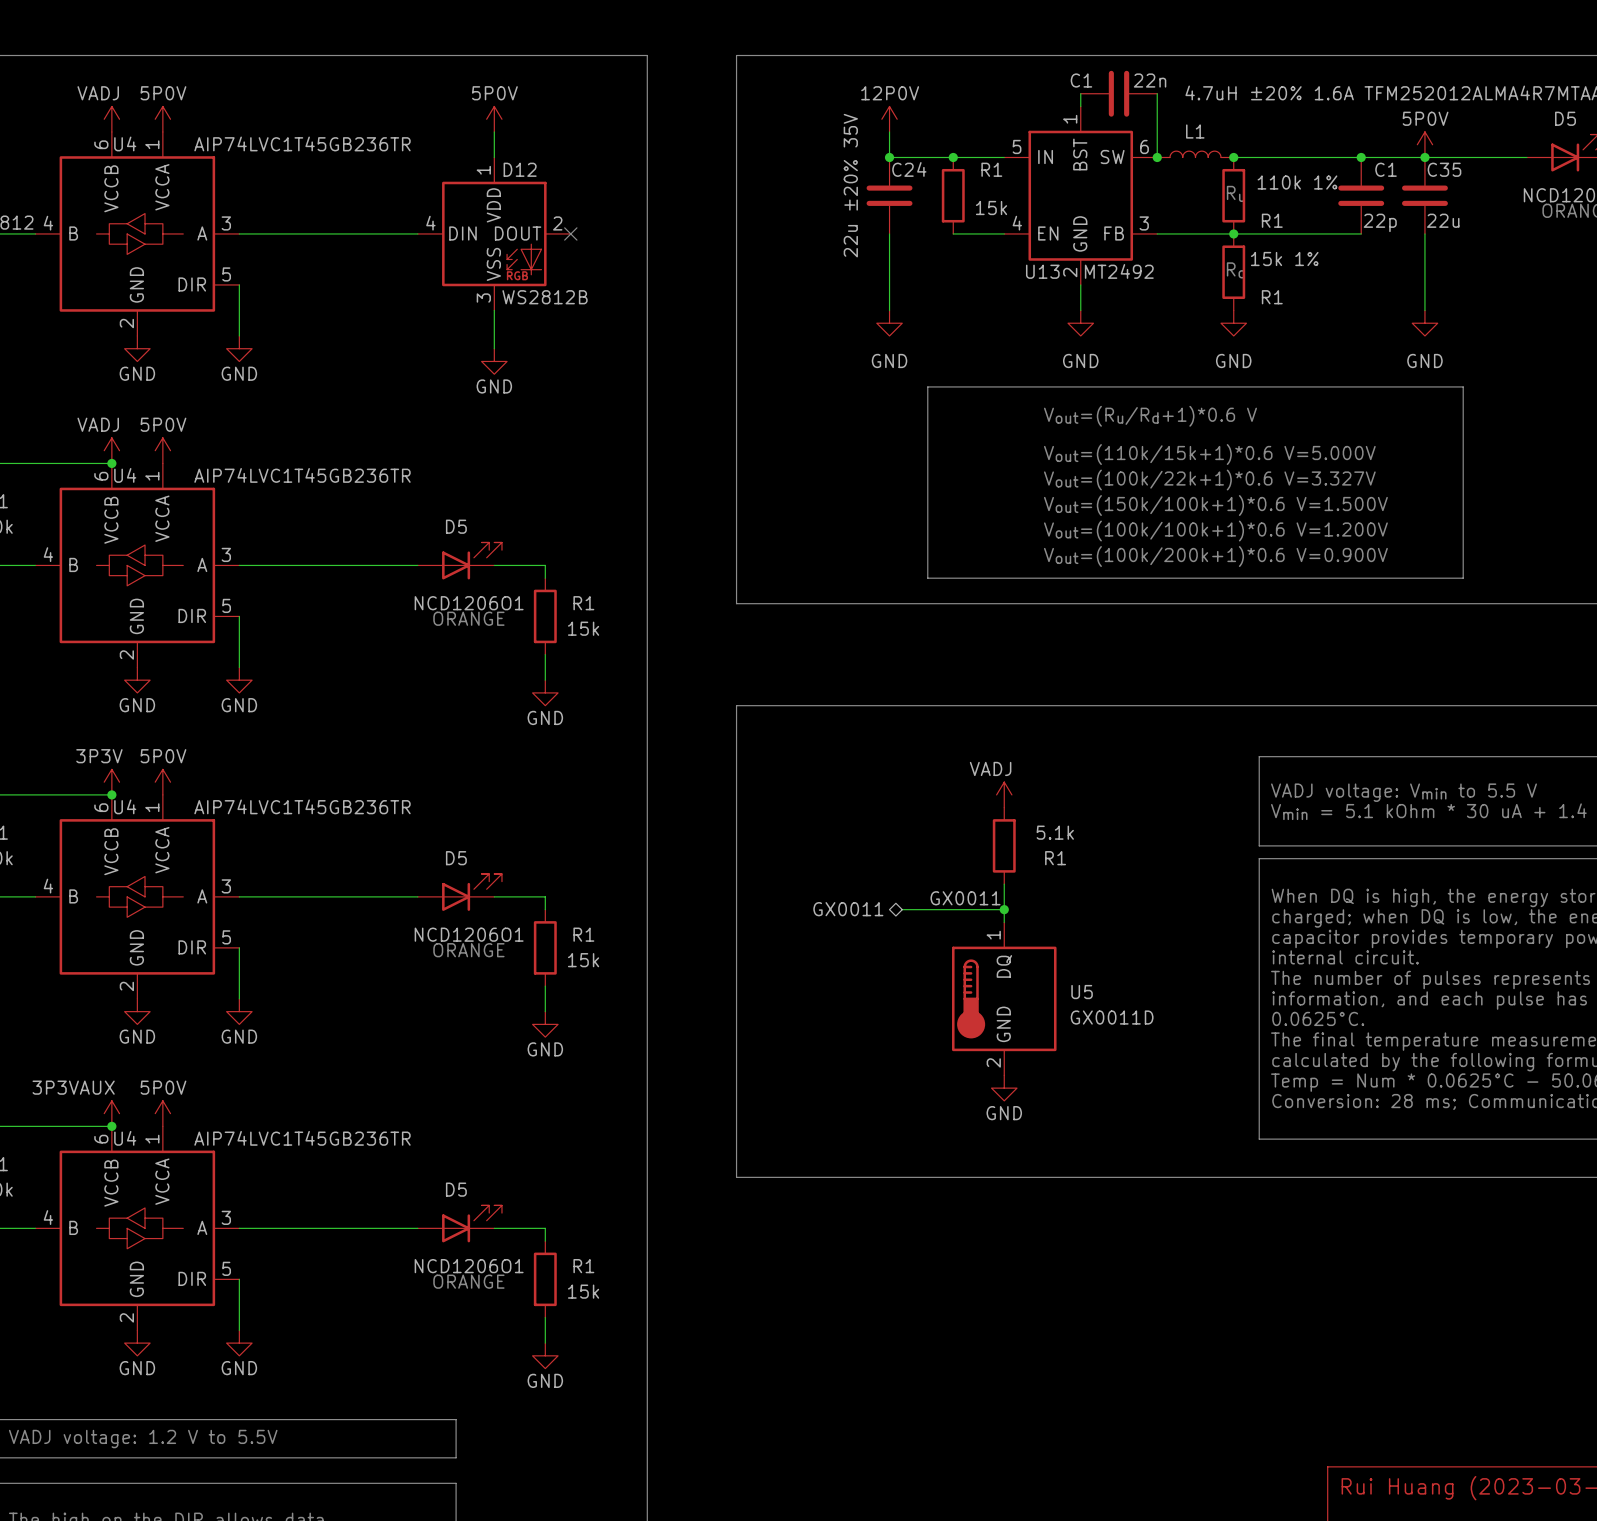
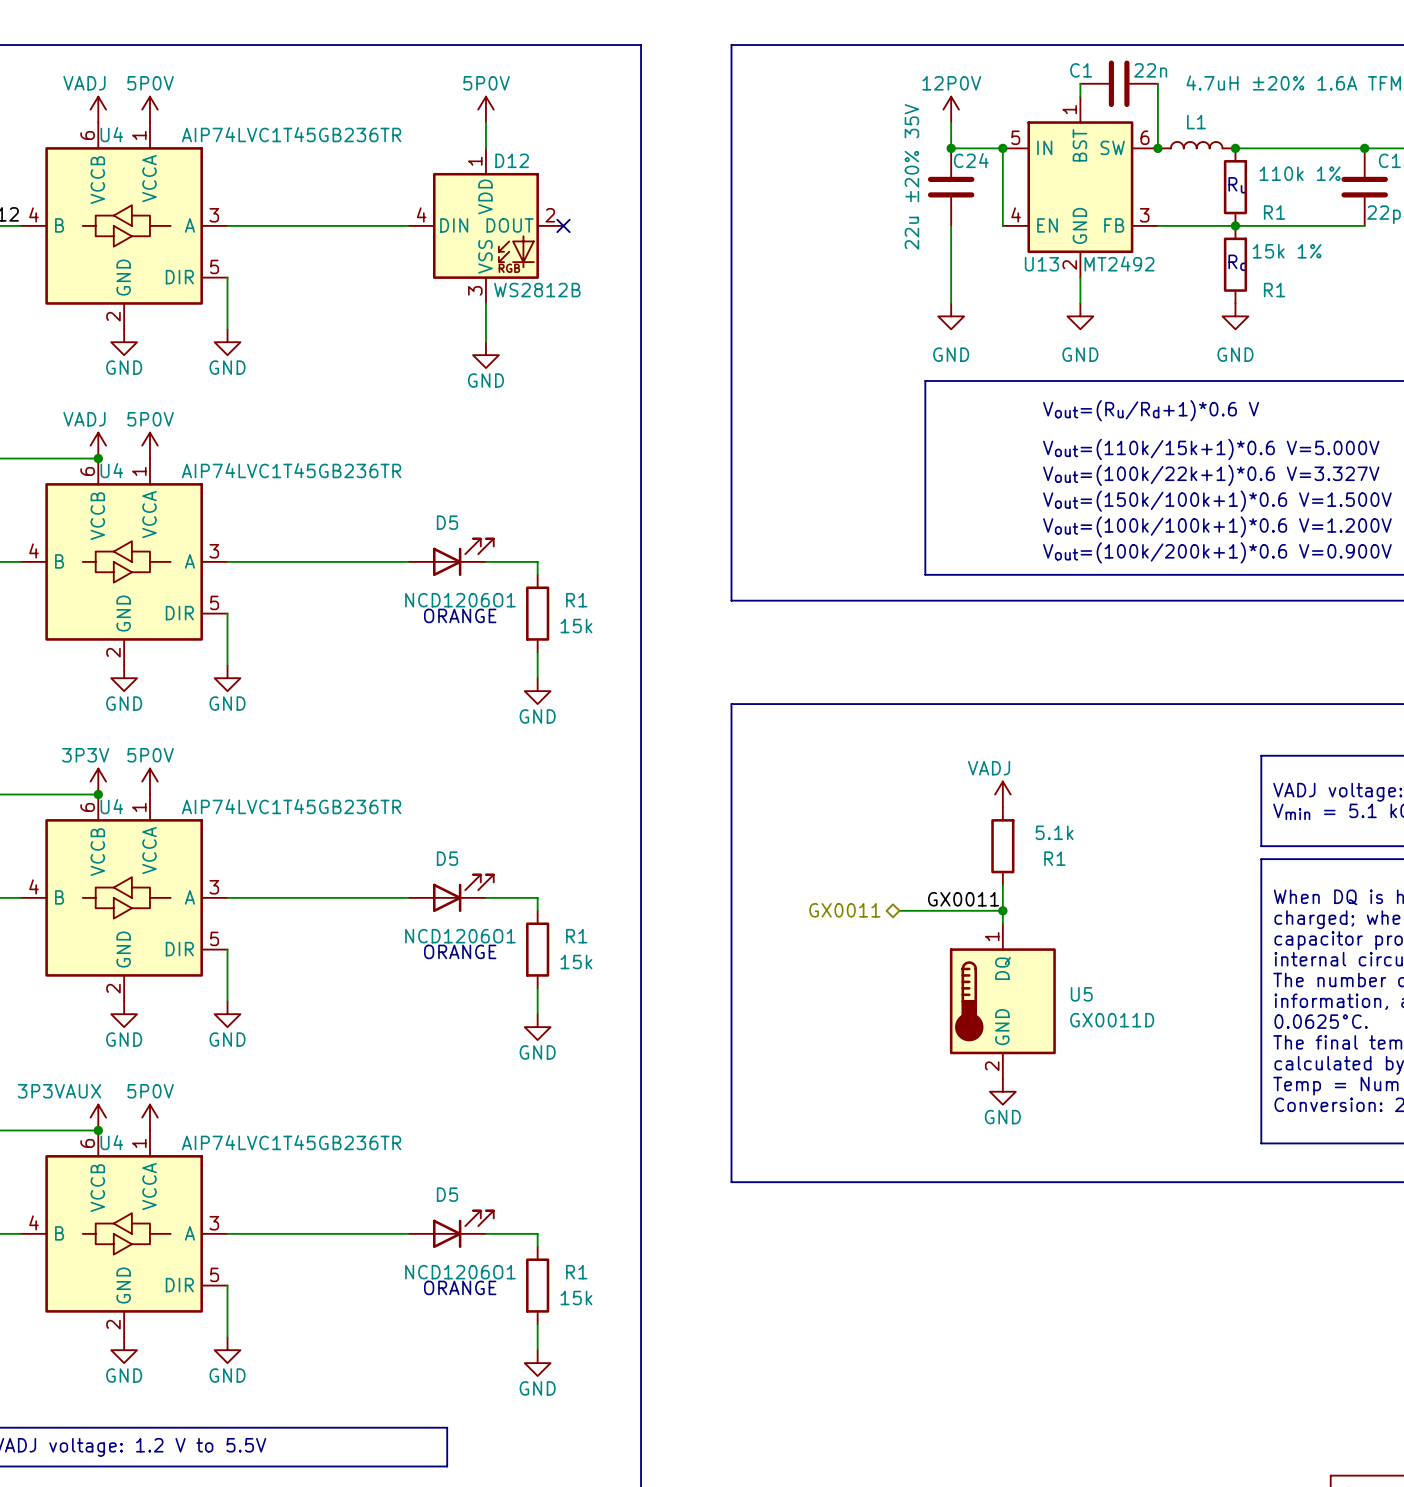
power symbol position: 12P0V (889, 119) -> 12P0V (951, 109)
wire: (889, 131) (889, 157) (953, 157) -> (951, 122) (951, 148)
junction: (889, 157) -> none
junction: none -> (1002, 148)
C24 position: (889, 195) -> (951, 187)
R1: 15k (953, 195) -> none
wire: (889, 233) (889, 310) -> (951, 225) (951, 303)
wire: (953, 233) (1004, 233) -> (1002, 148) (1002, 225)
power symbol position: GND (889, 323) -> GND (951, 316)

